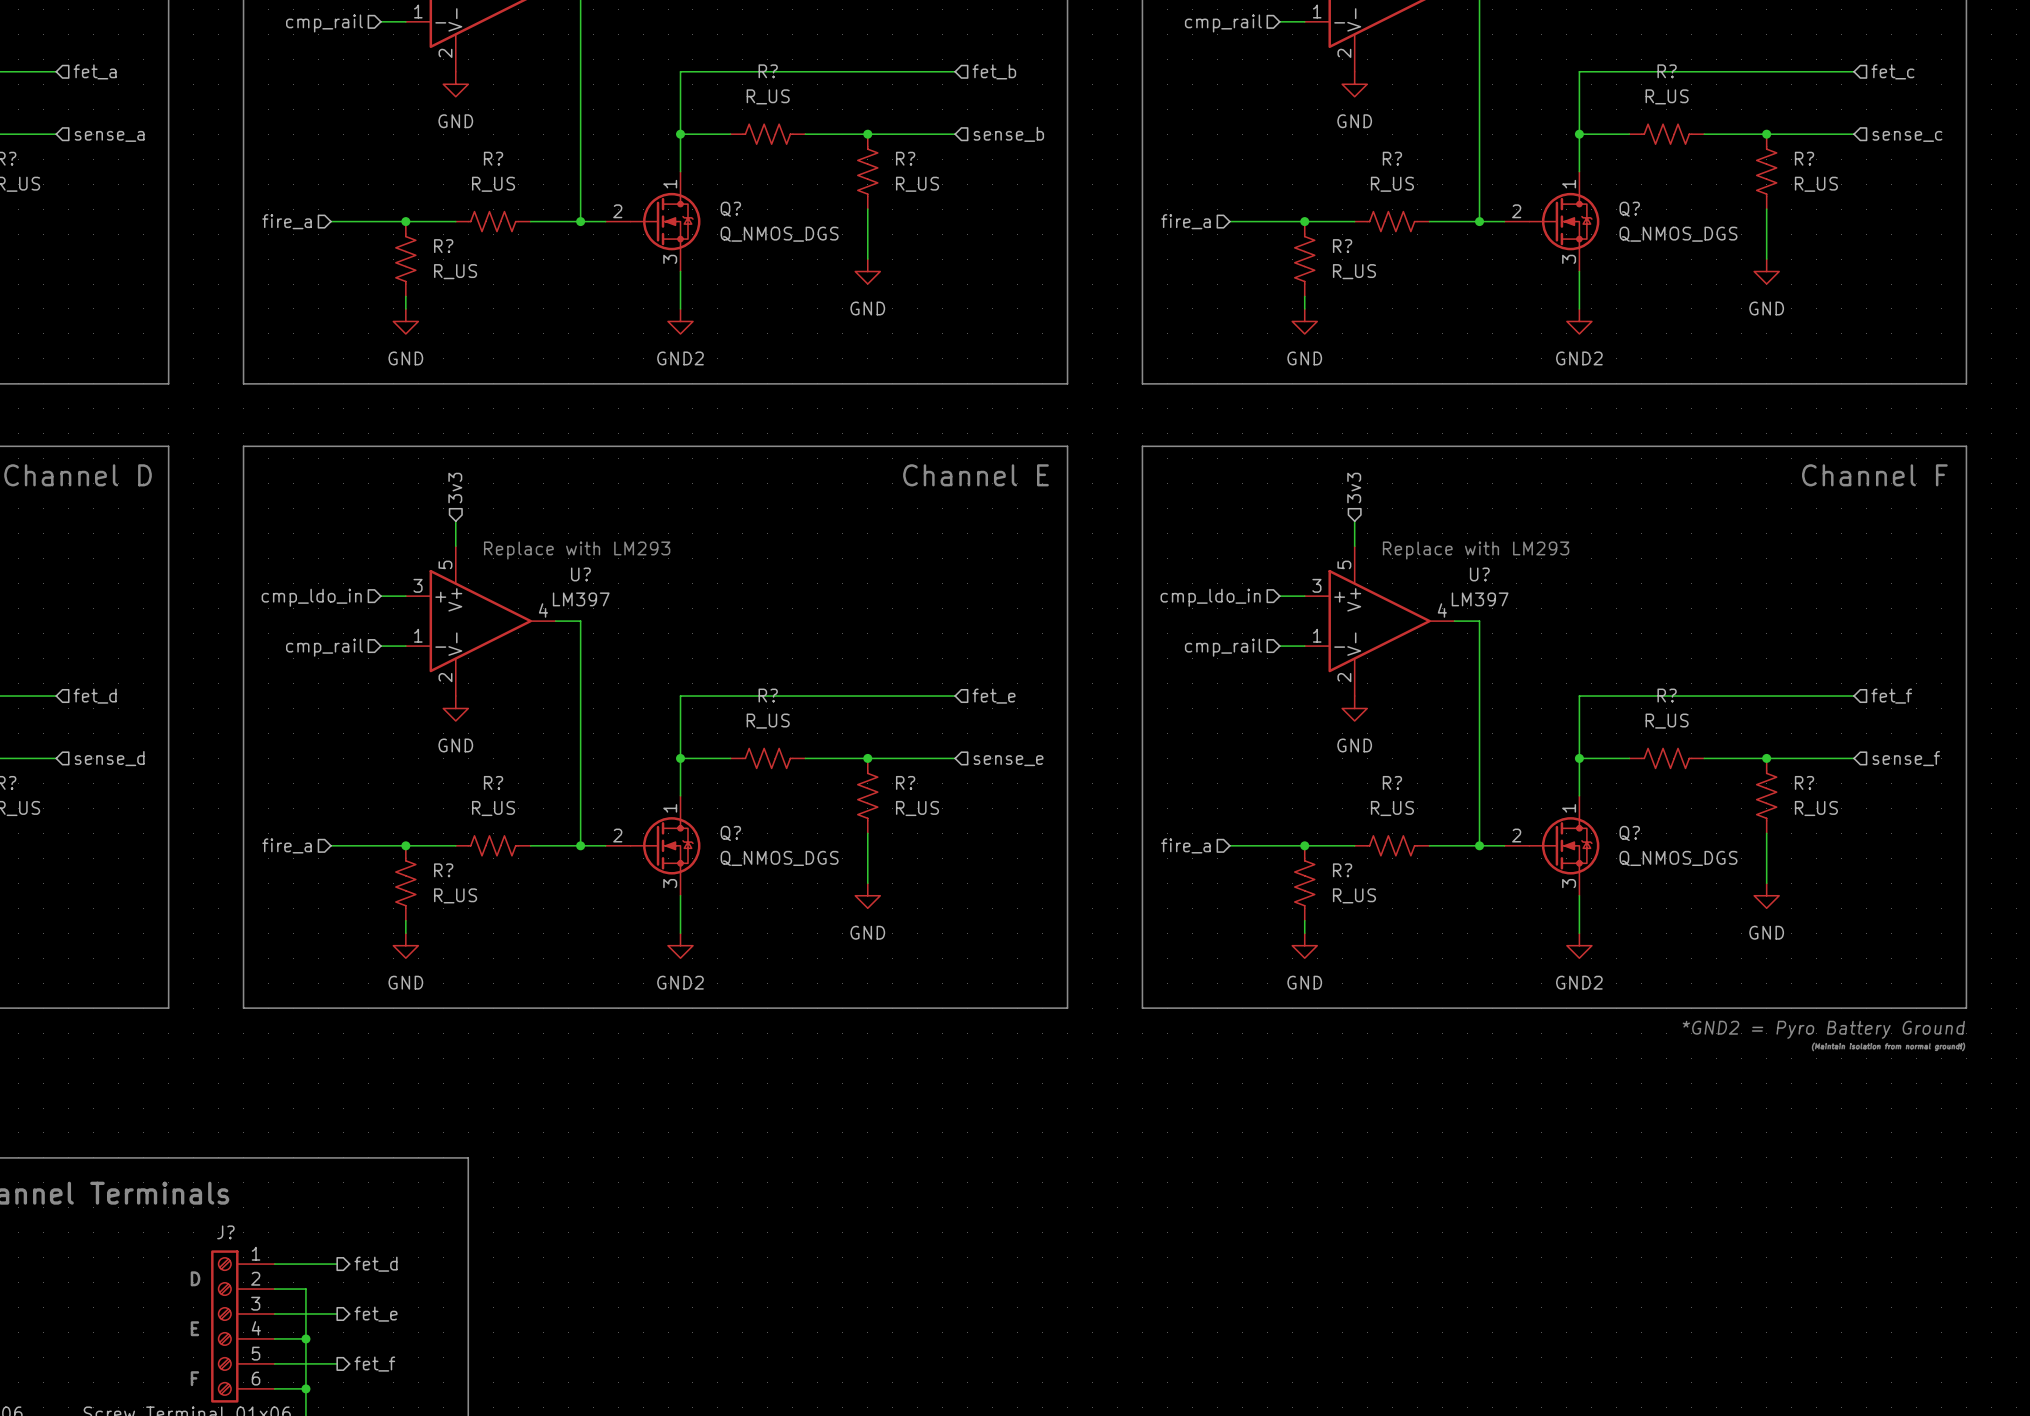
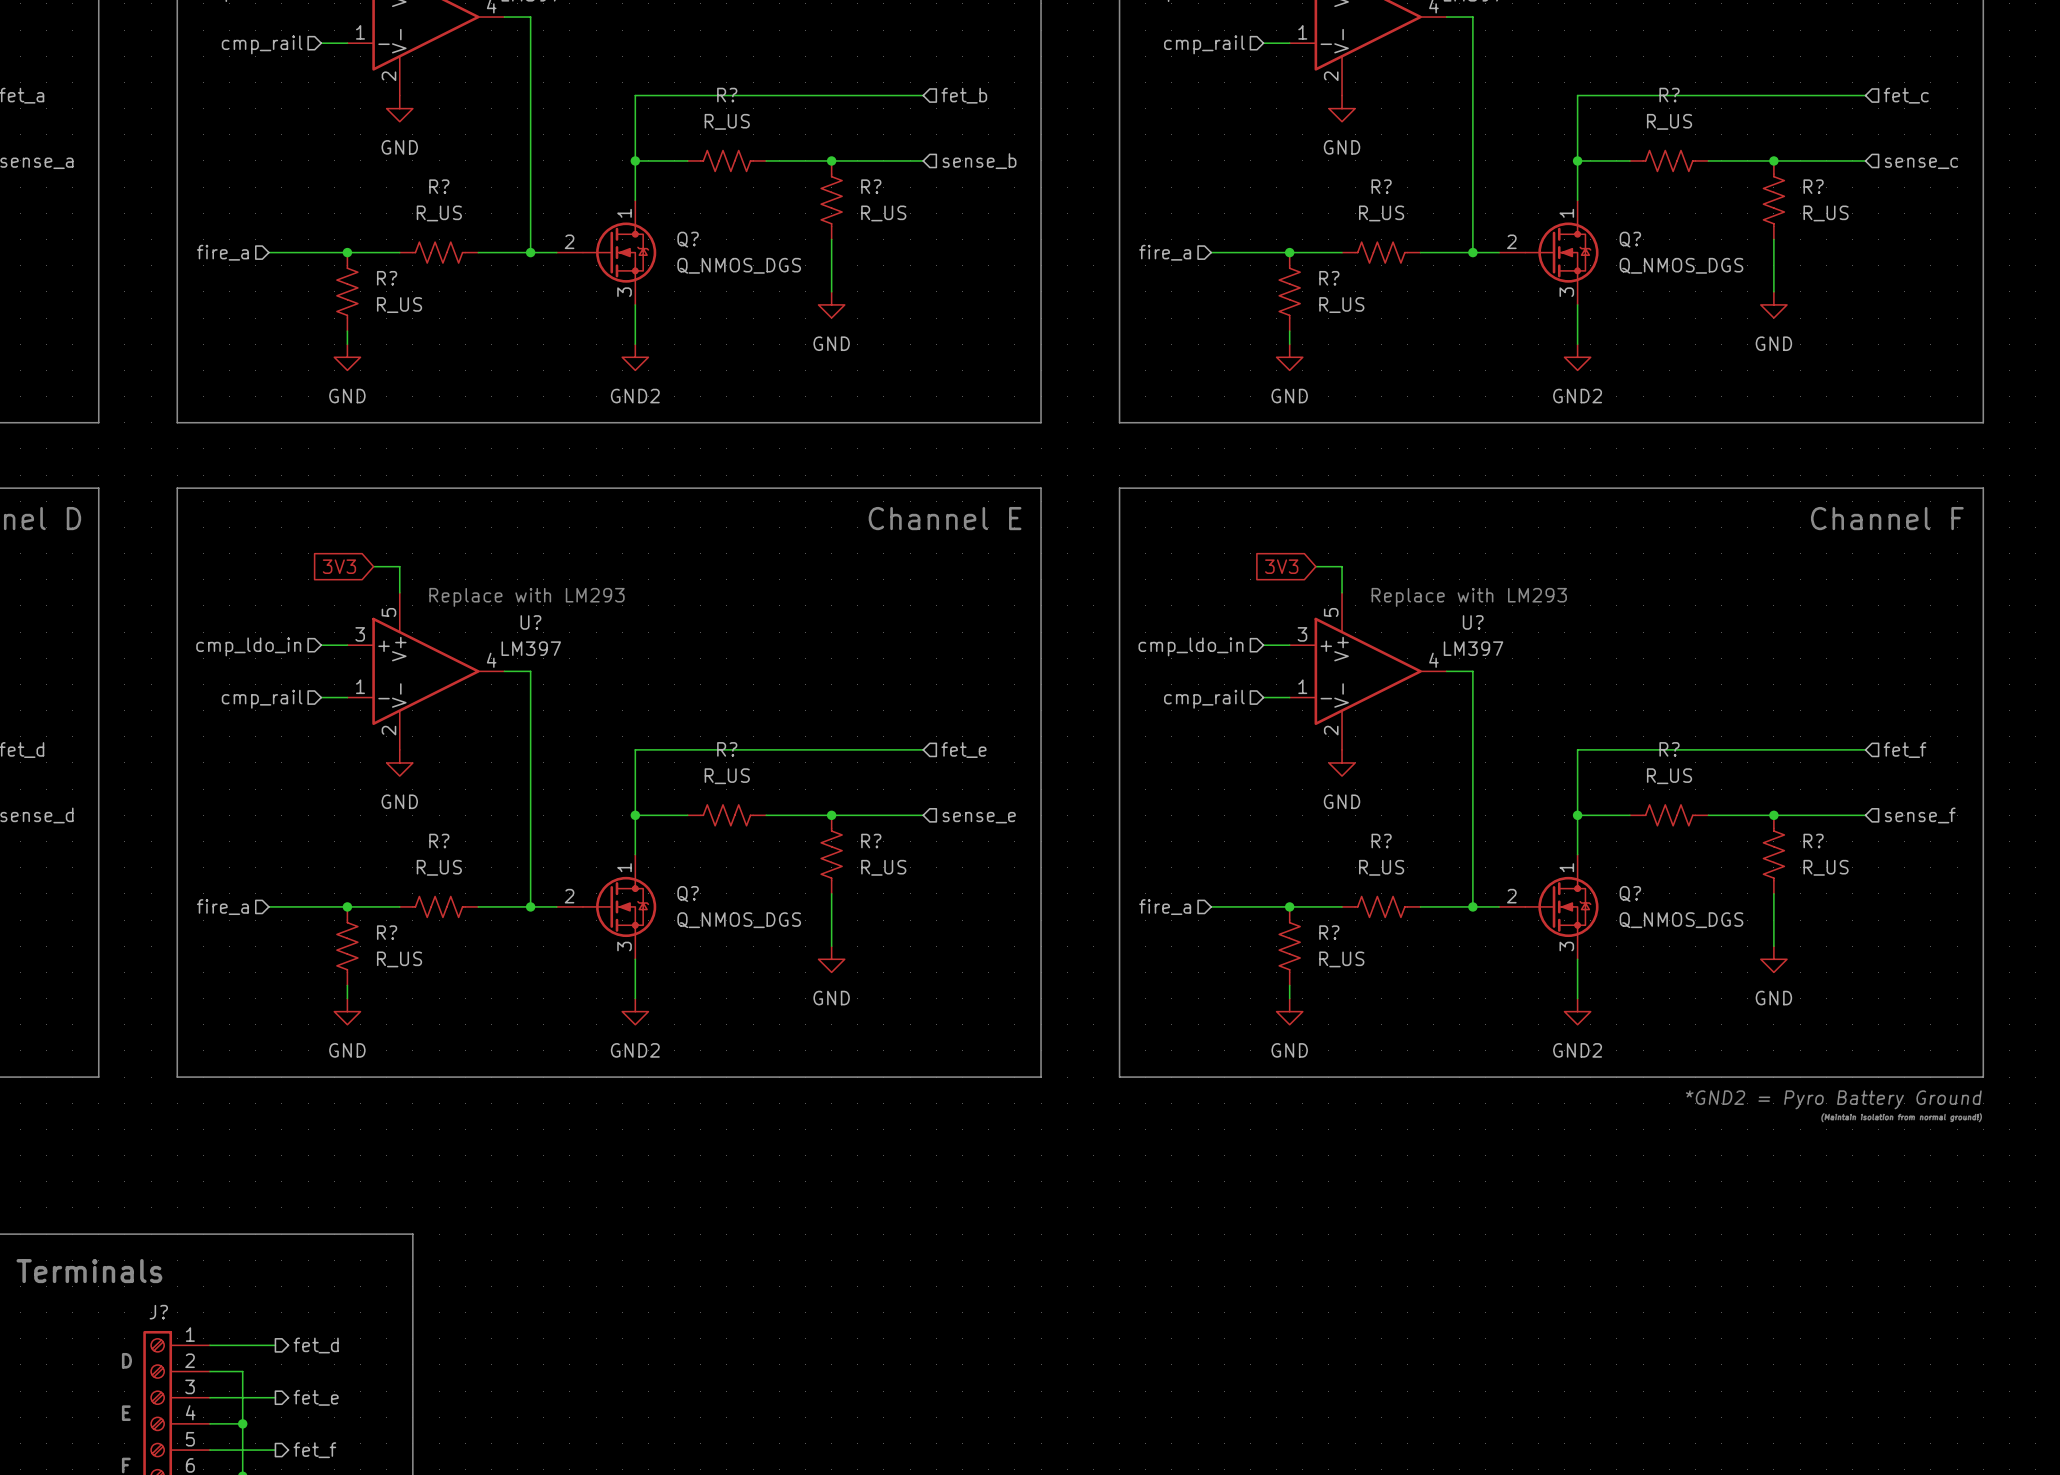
hierarchical label: 3v3 (455, 488) -> none
hierarchical label: 3v3 (1354, 488) -> none
global label: none -> 3V3 (339, 566)
wire: none -> (373, 566) (399, 566)
global label: none -> 3V3 (1281, 566)
wire: none -> (1315, 566) (1342, 566)

